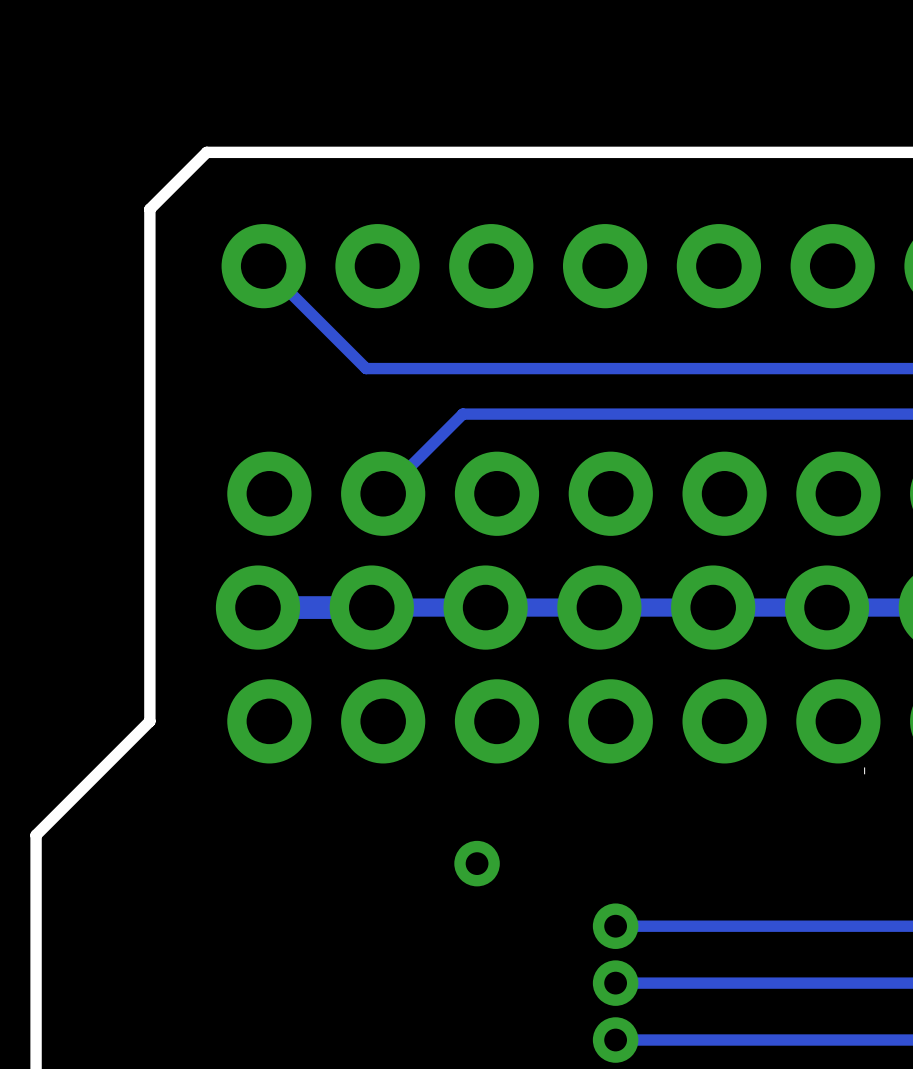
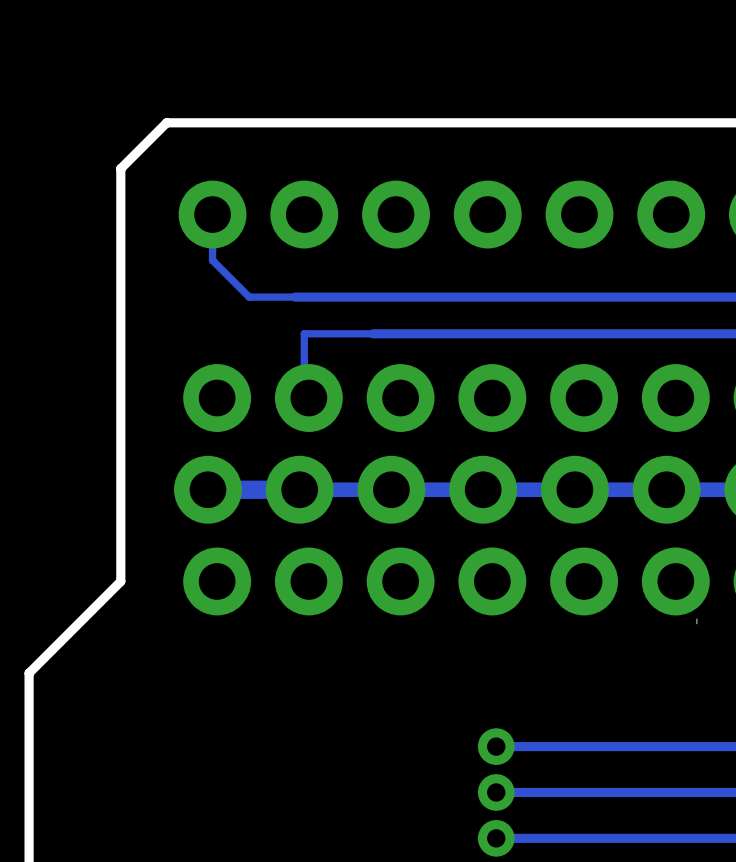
track: (263, 266) (366, 368) -> (212, 214) (212, 260) (249, 297) (295, 297)
track: (462, 414) (383, 493) -> (373, 333) (304, 333) (304, 393) (308, 398)
via: (477, 863) -> none

